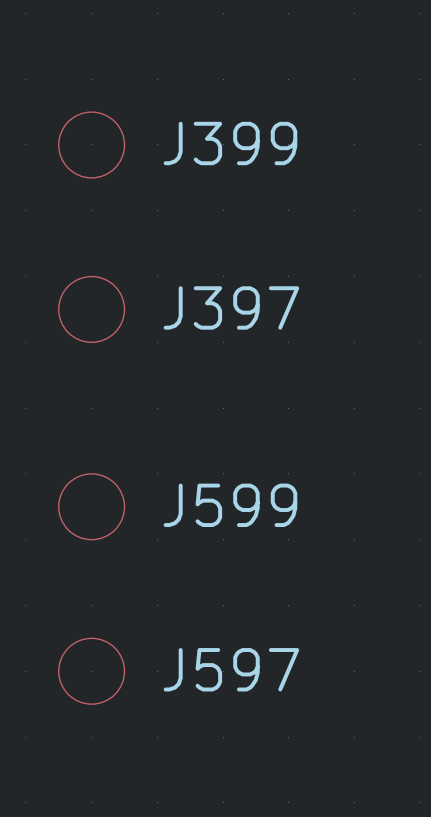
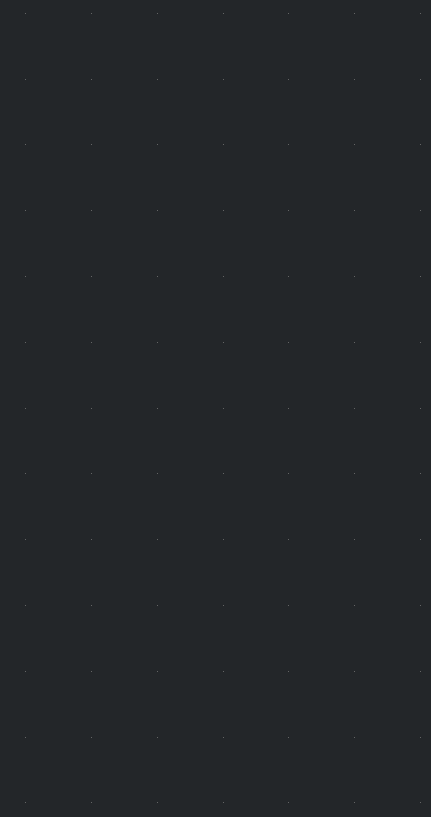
J399: (91, 144) -> none
J397: (91, 309) -> none
J599: (91, 506) -> none
J597: (91, 671) -> none

